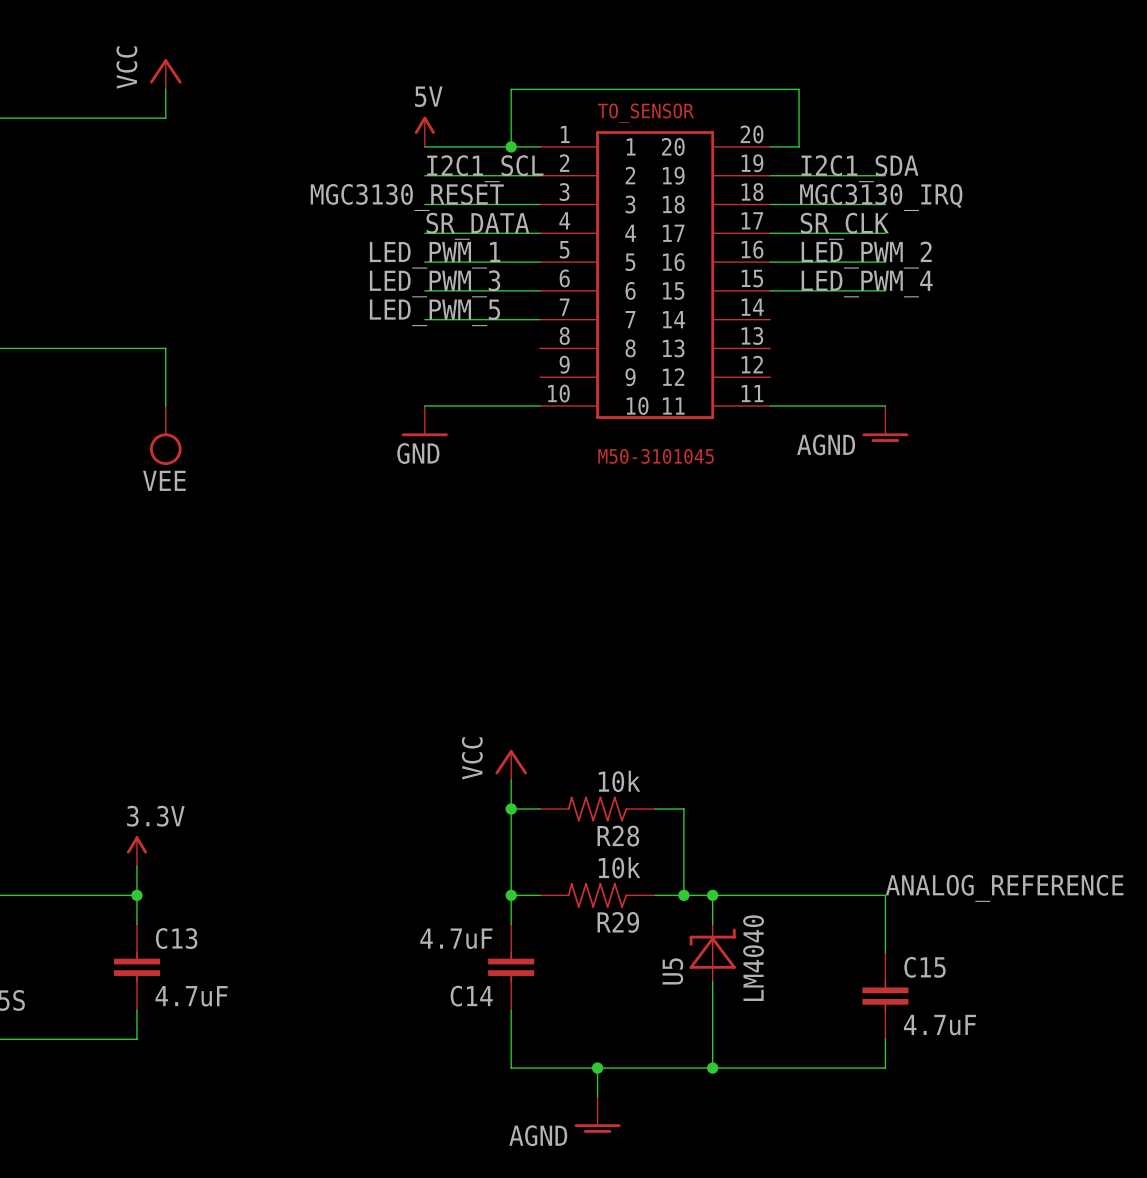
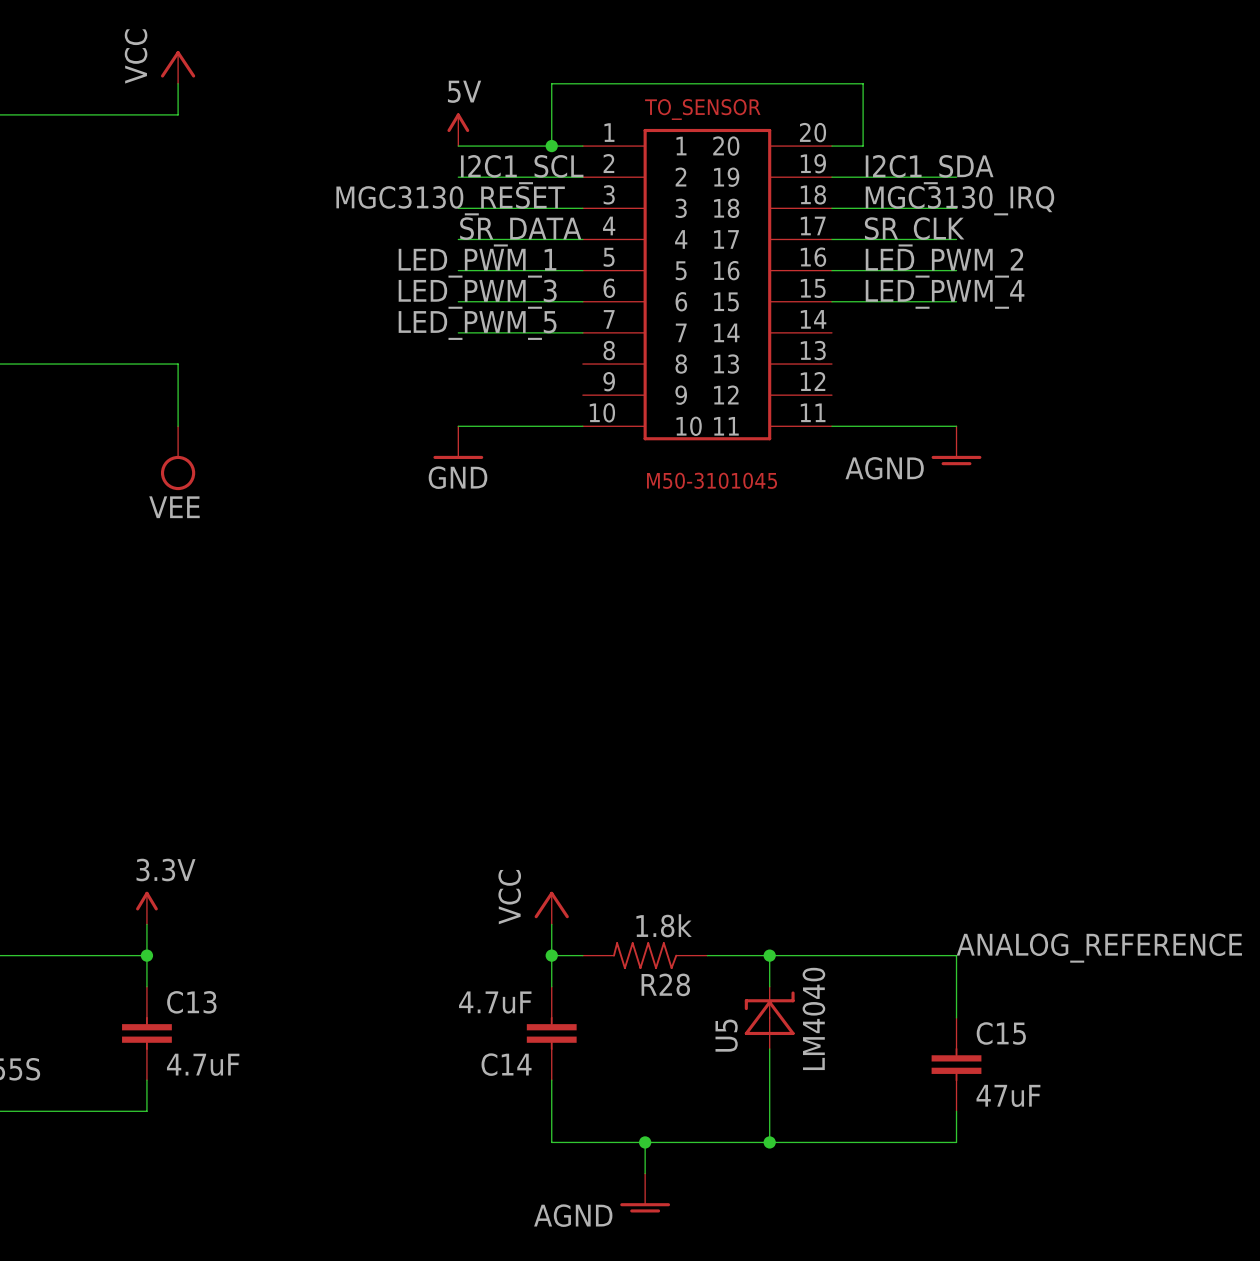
power symbol position: VCC (511, 765) -> VCC (551, 908)
wire: (511, 780) (511, 866) -> none
wire: (511, 809) (539, 809) -> none
junction: (511, 809) -> none
R28: 10k (597, 809) -> none
wire: (655, 809) (683, 809) (683, 895) -> none
R29 value: 10k (619, 867) -> 1.8k (664, 925)
junction: (683, 895) -> none
R29 name: R29 (618, 922) -> R28 (665, 984)
C15 value: 4.7uF (940, 1025) -> 47uF (1008, 1095)

